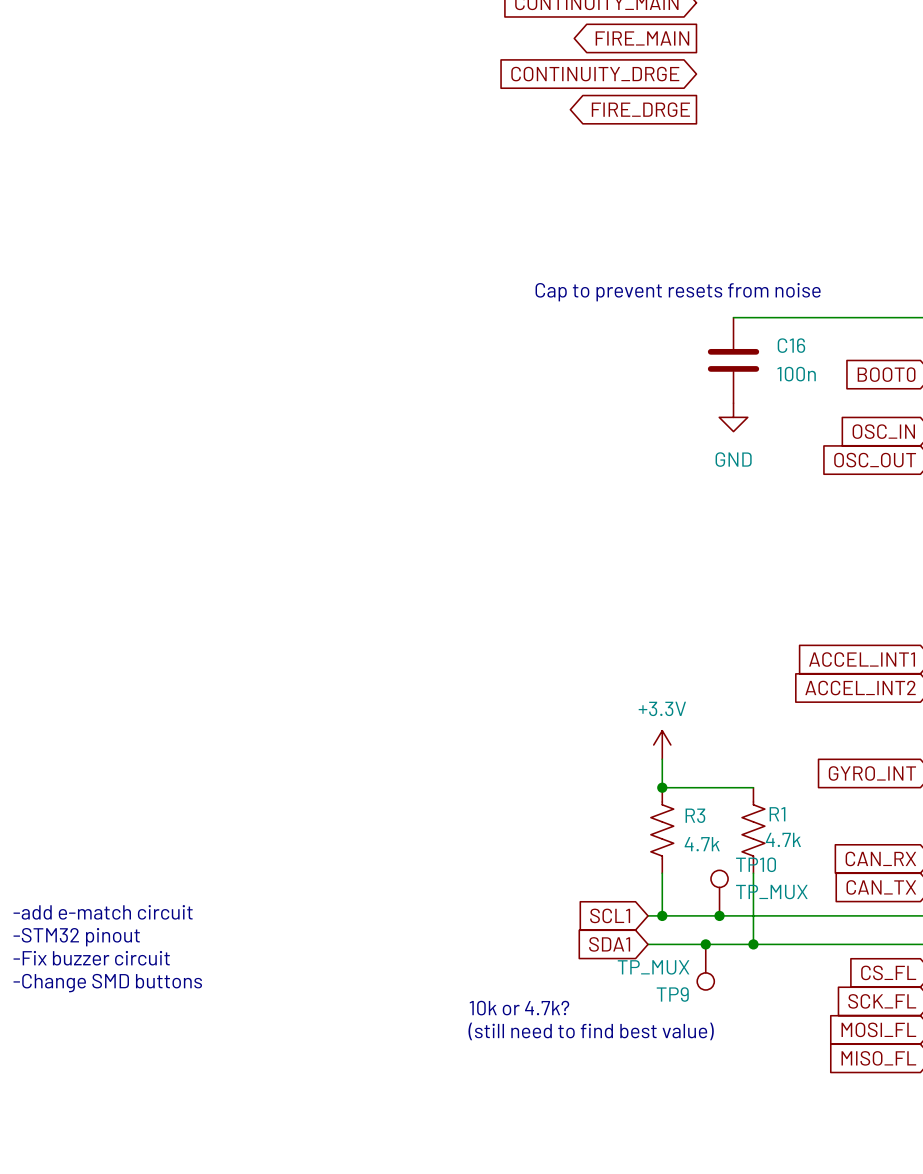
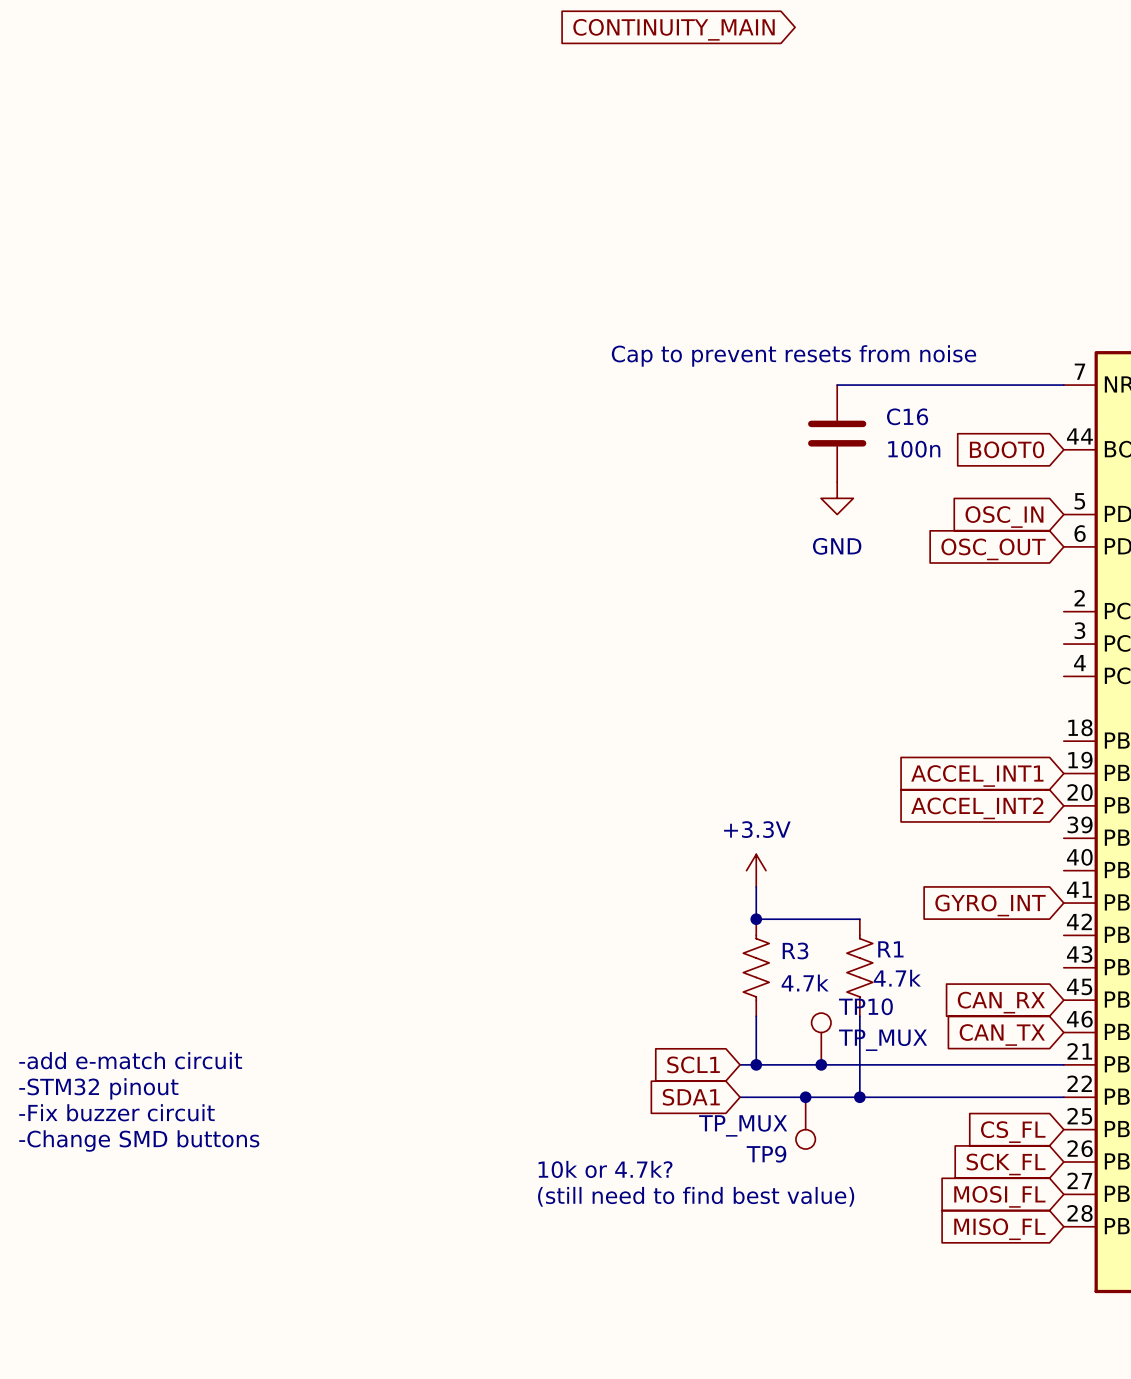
global label: FIRE_MAIN (642, 38) -> none
global label: CONTINUITY_DRGE (595, 74) -> none
global label: FIRE_DRGE (640, 109) -> none

